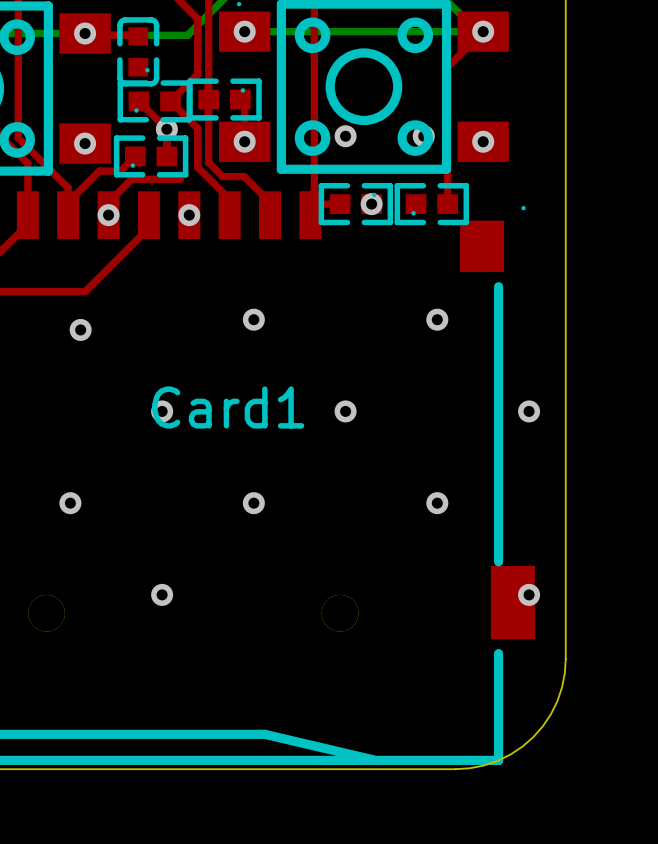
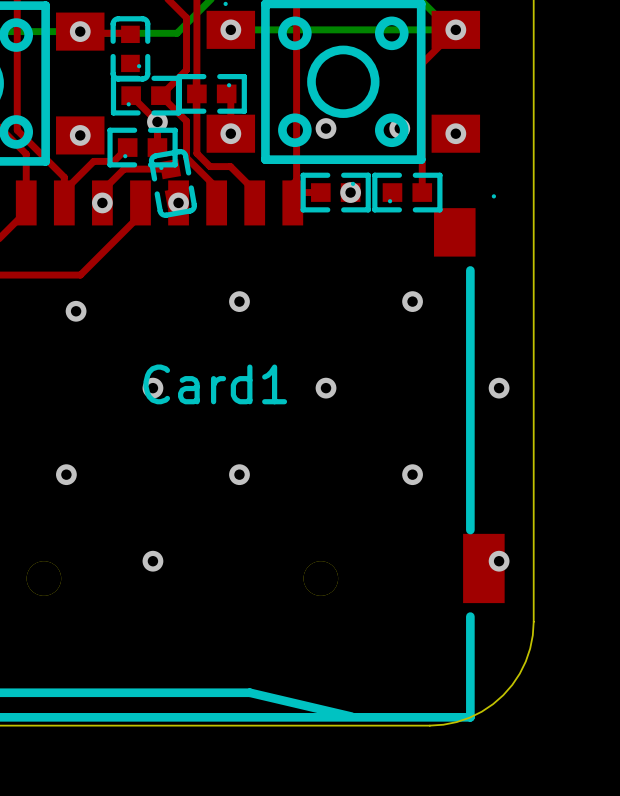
part: none -> (172, 183)

